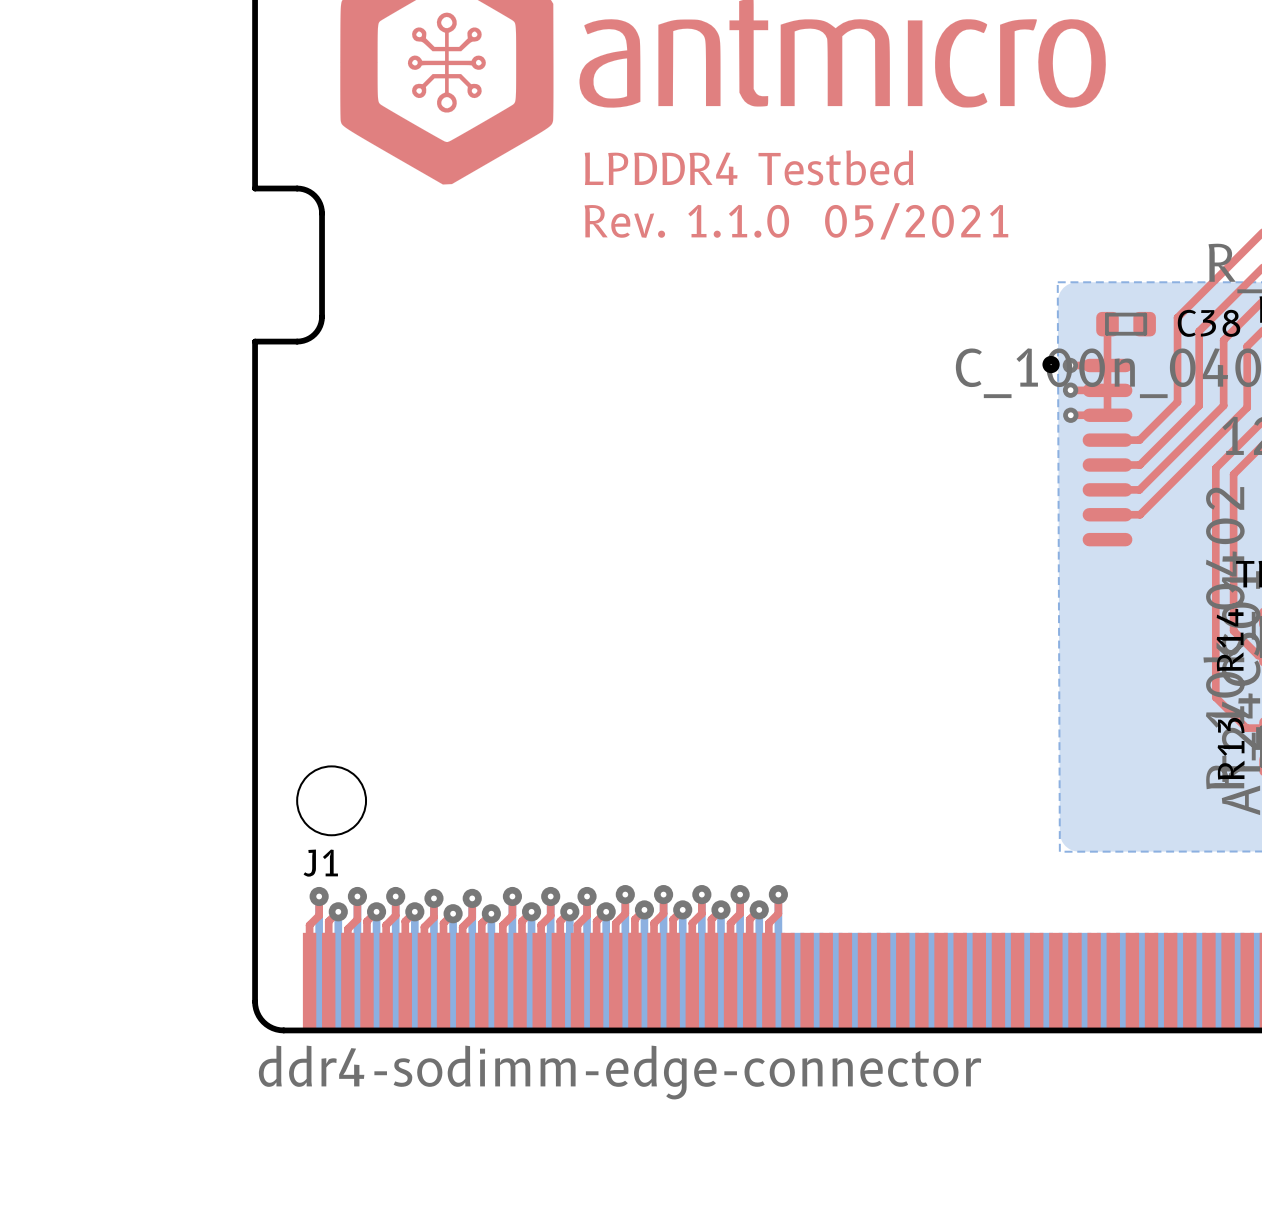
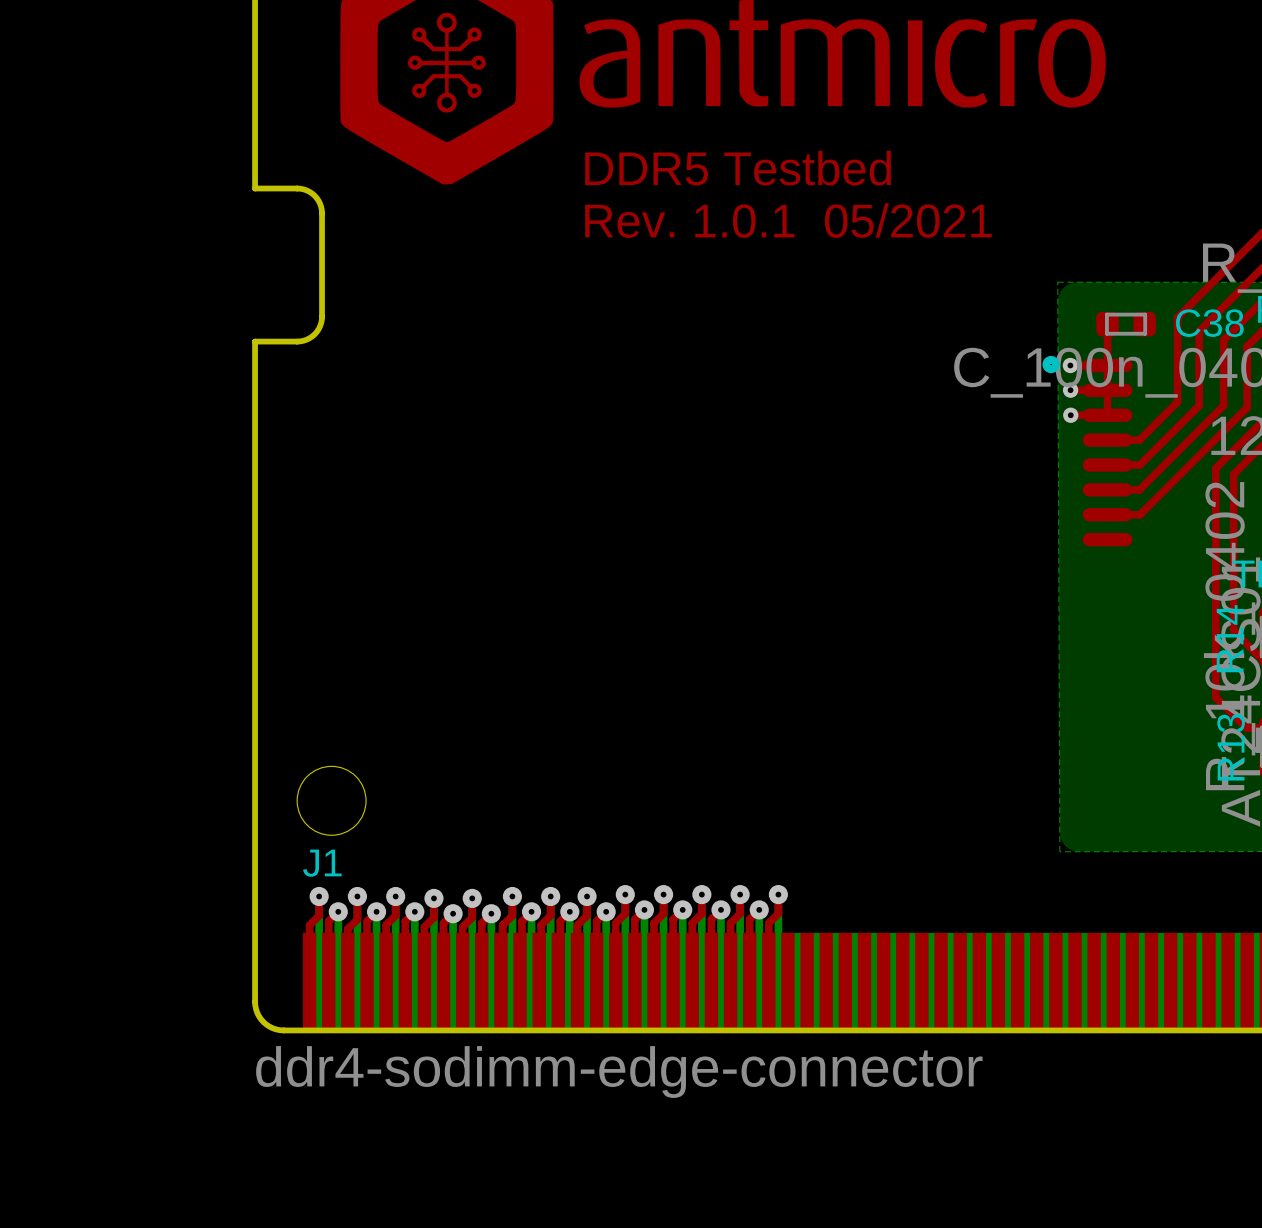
text: LPDDR4 Testbed (749, 167) -> DDR5 Testbed (738, 168)
text: Rev. 1.1.0 05/2021 (796, 221) -> Rev. 1.0.1 05/2021 (788, 220)

